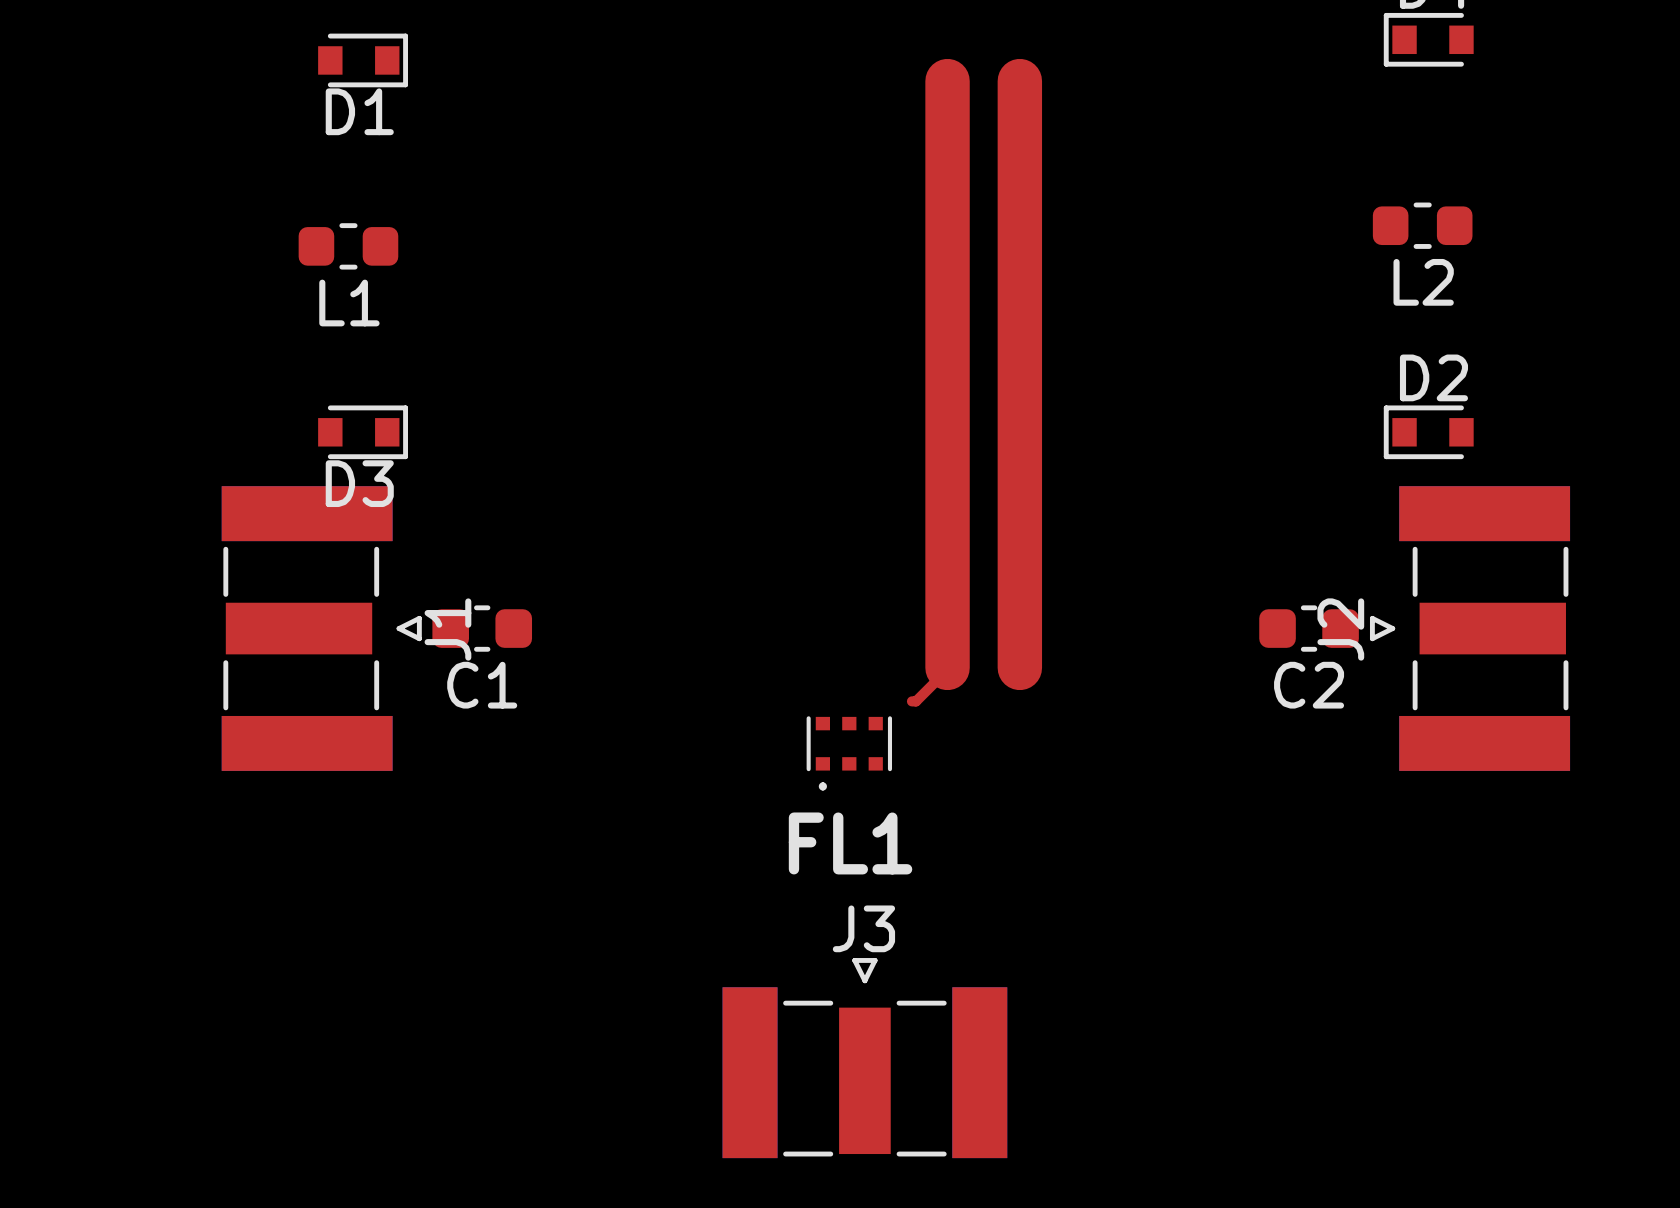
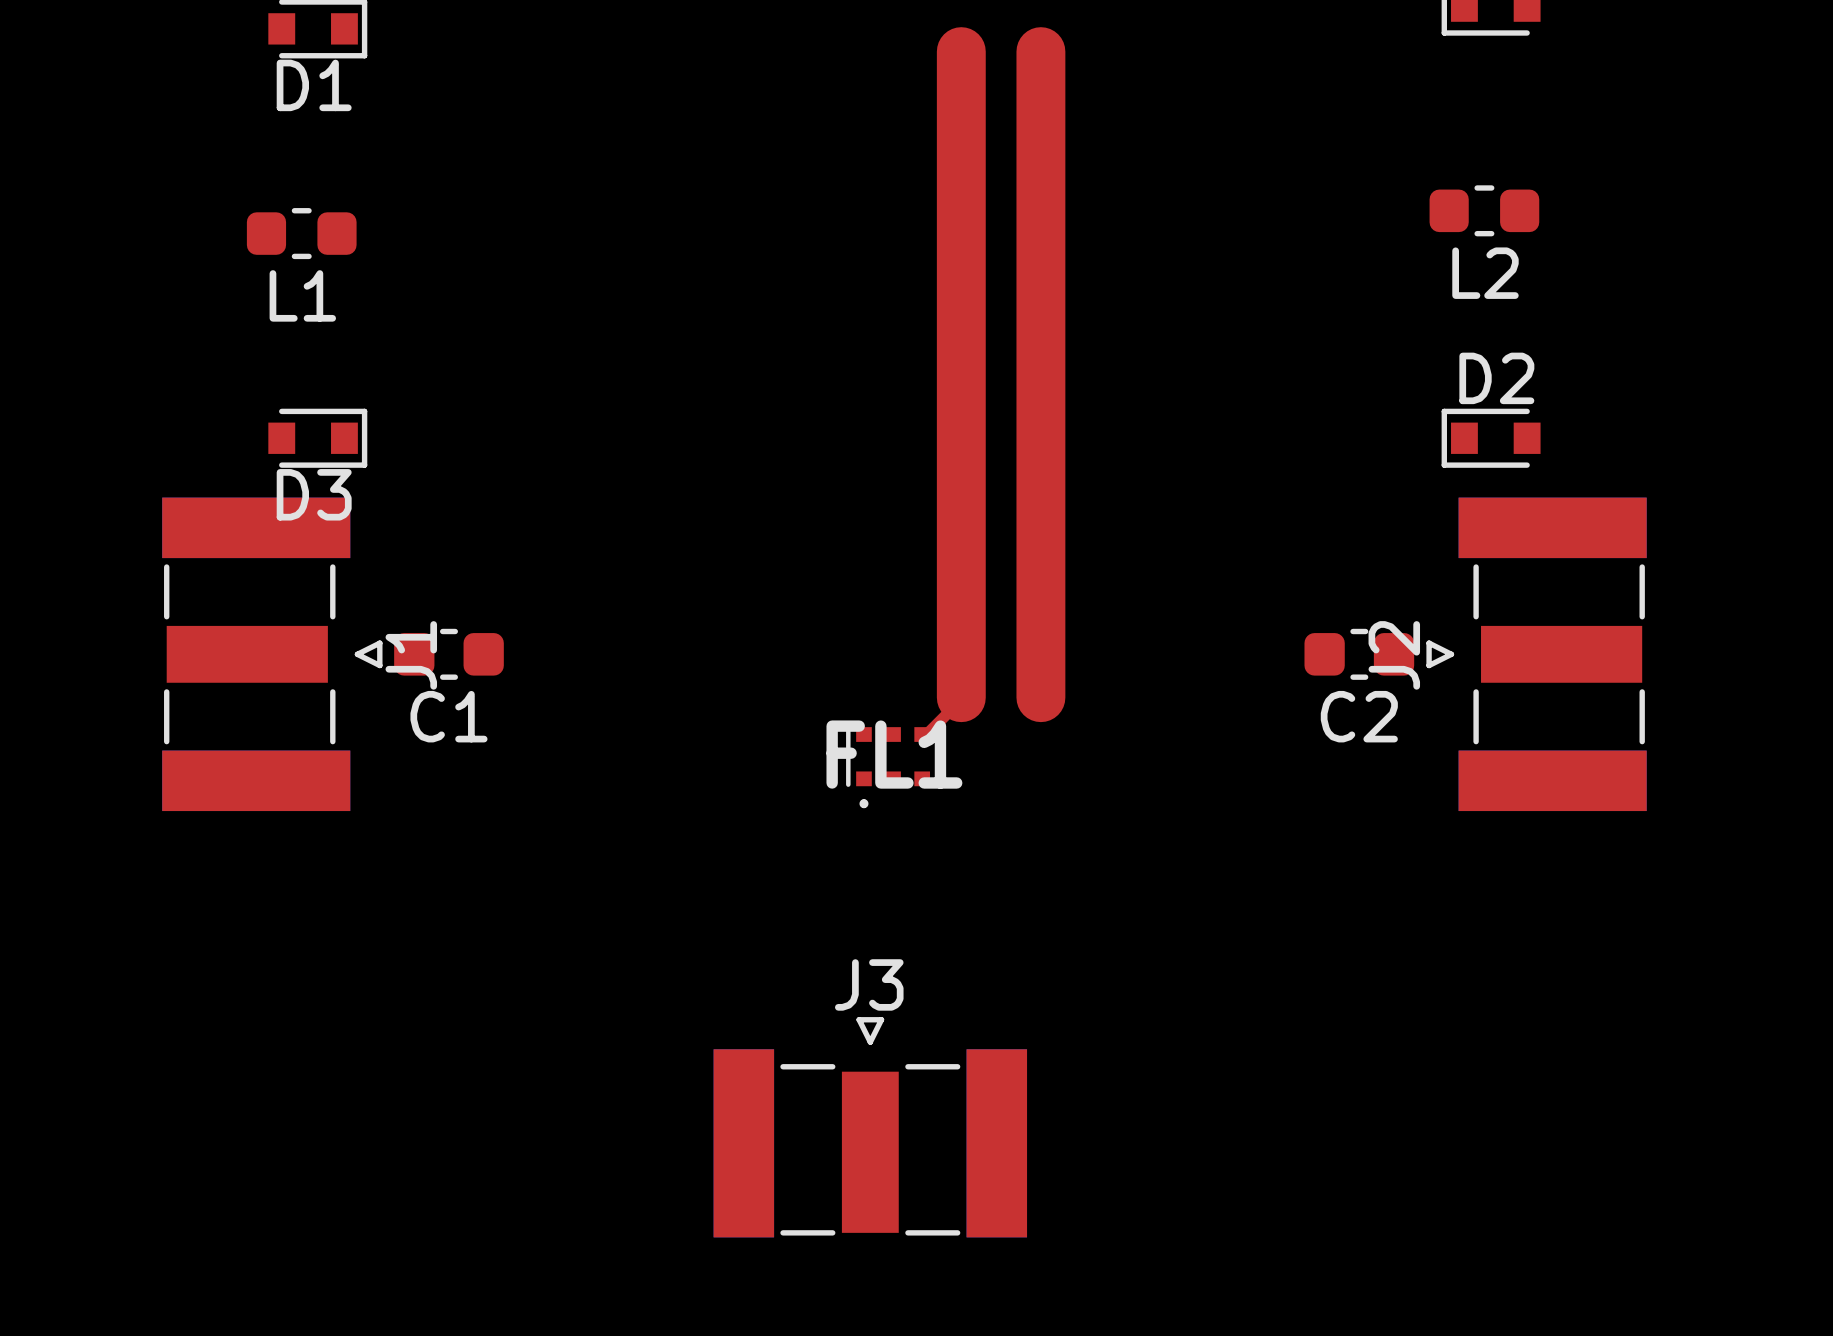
FL1 position: (849, 753) -> (893, 767)
FL1 name position: FL1 (850, 843) -> FL1 (894, 754)

